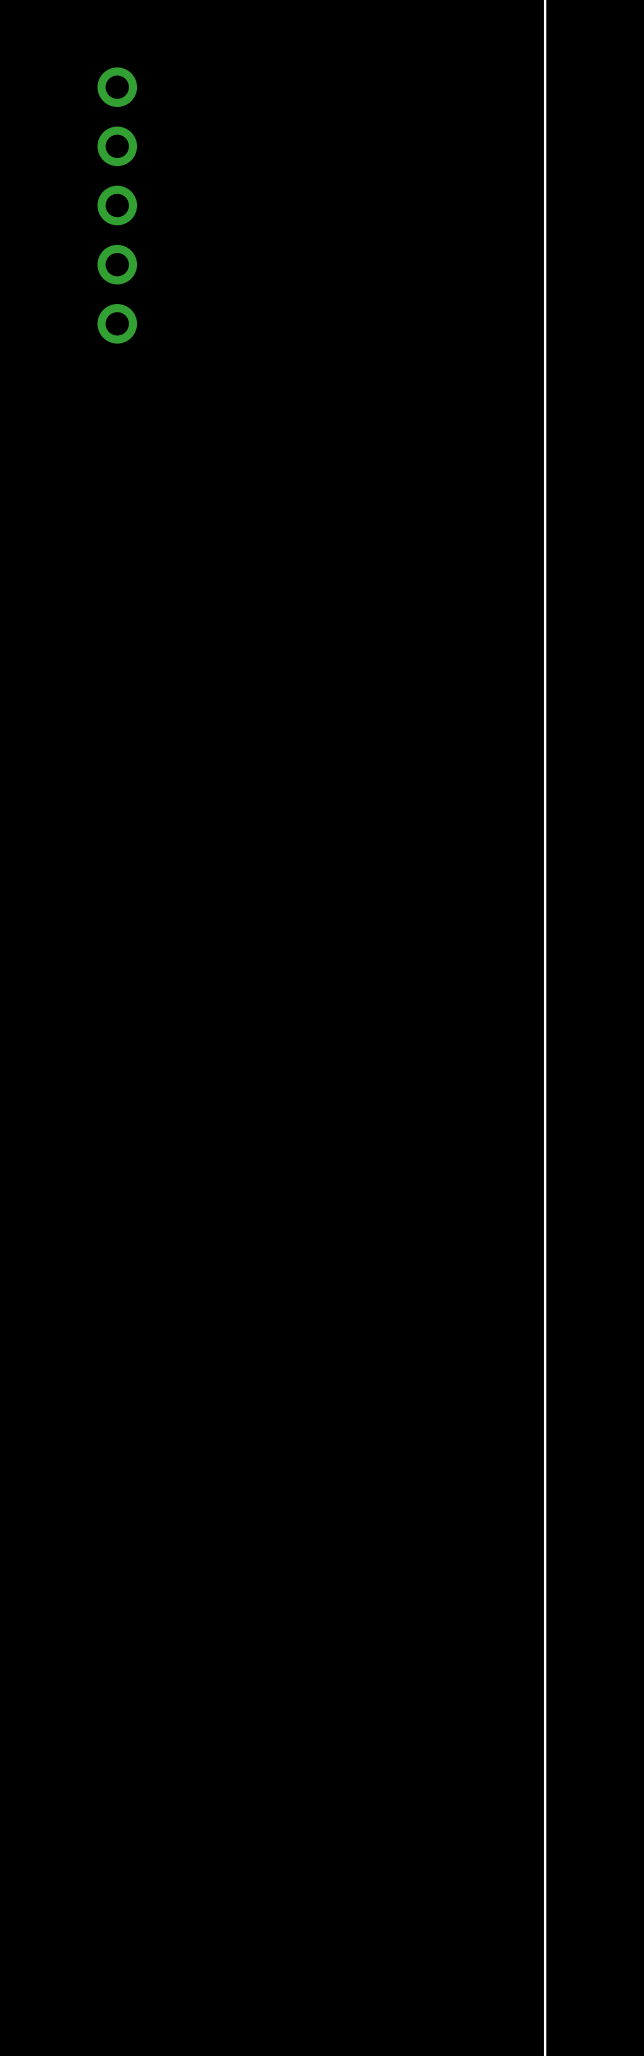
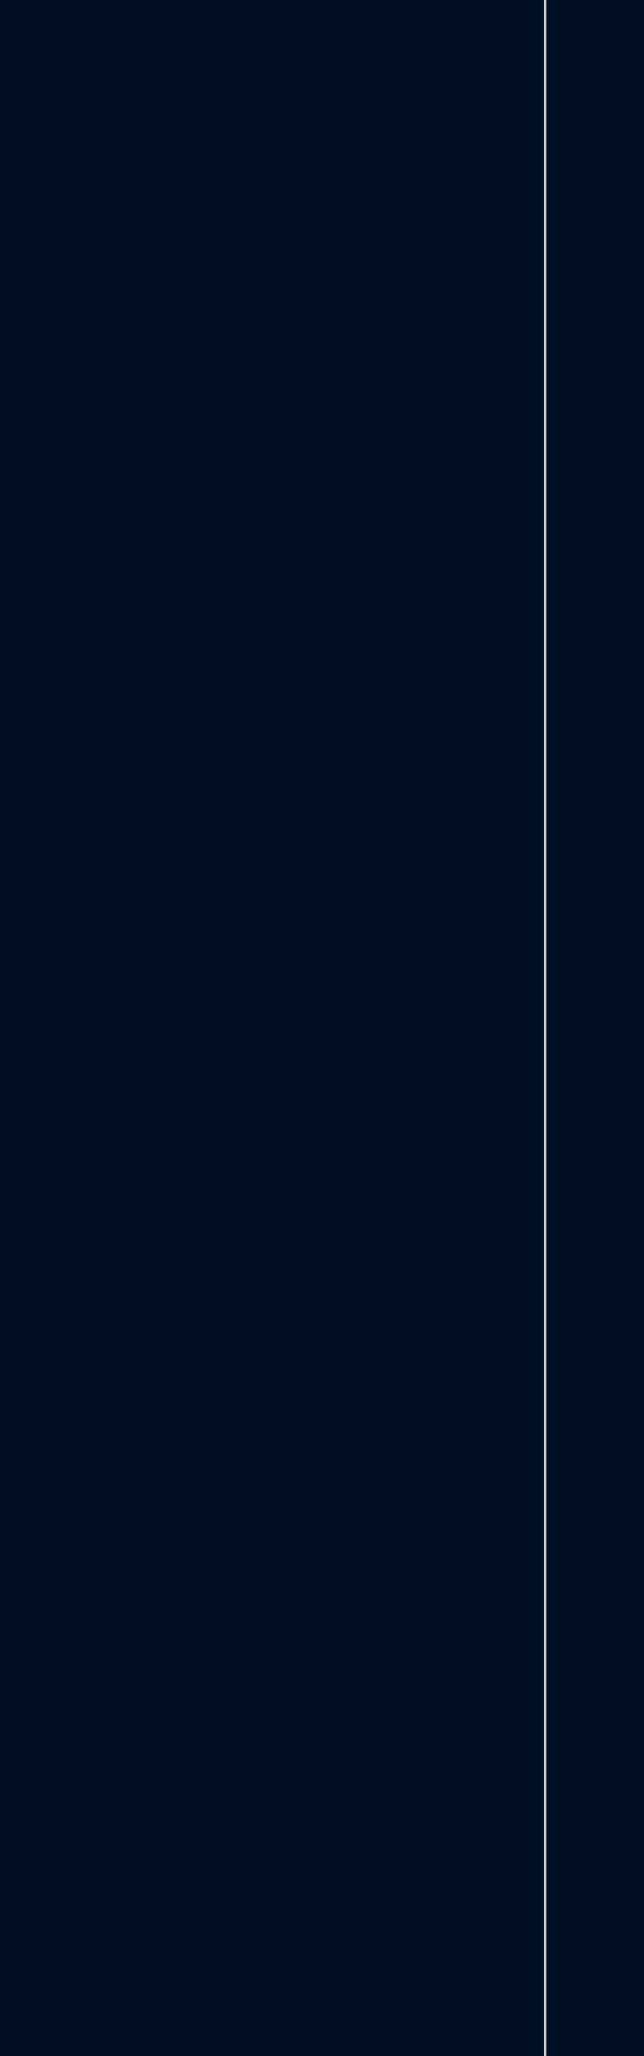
part: (117, 205) -> none

